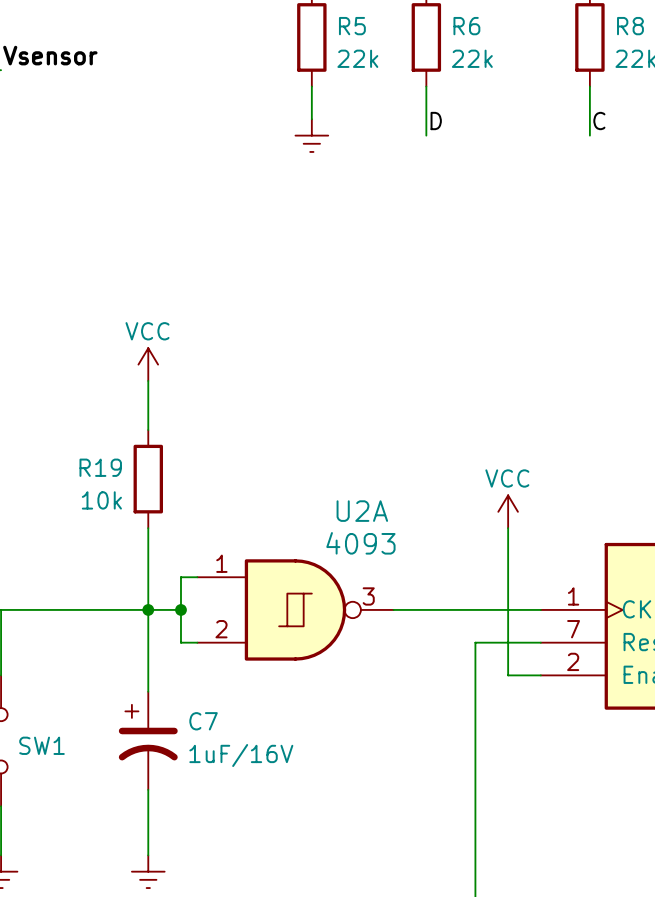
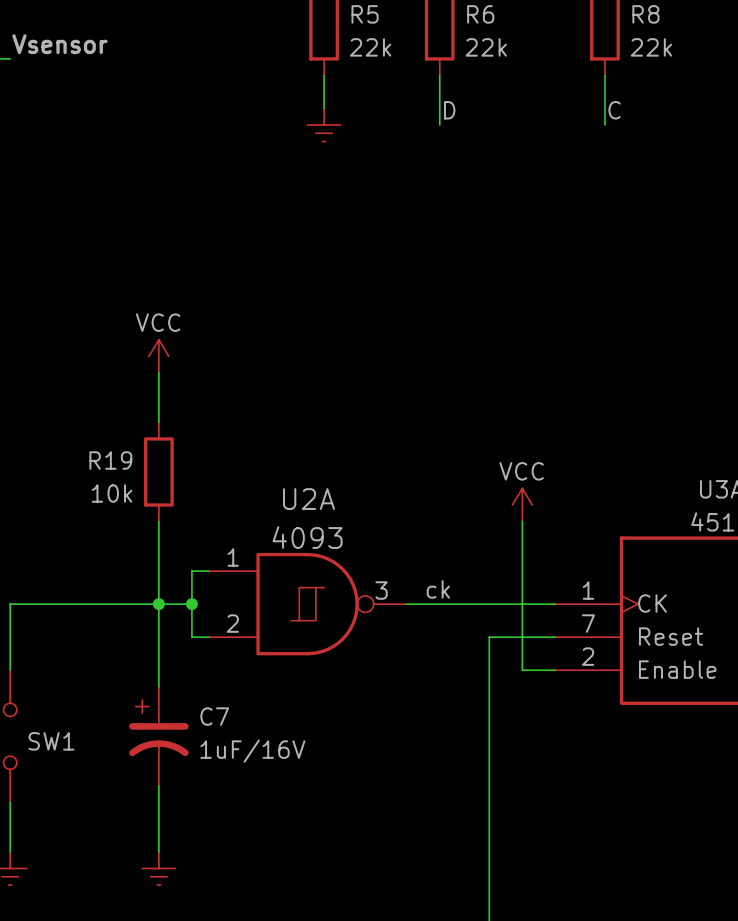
U2A name position: U2A (362, 511) -> U2A (309, 499)
U2A value position: 4093 (360, 543) -> 4093 (307, 537)
label: none -> ck (438, 589)

